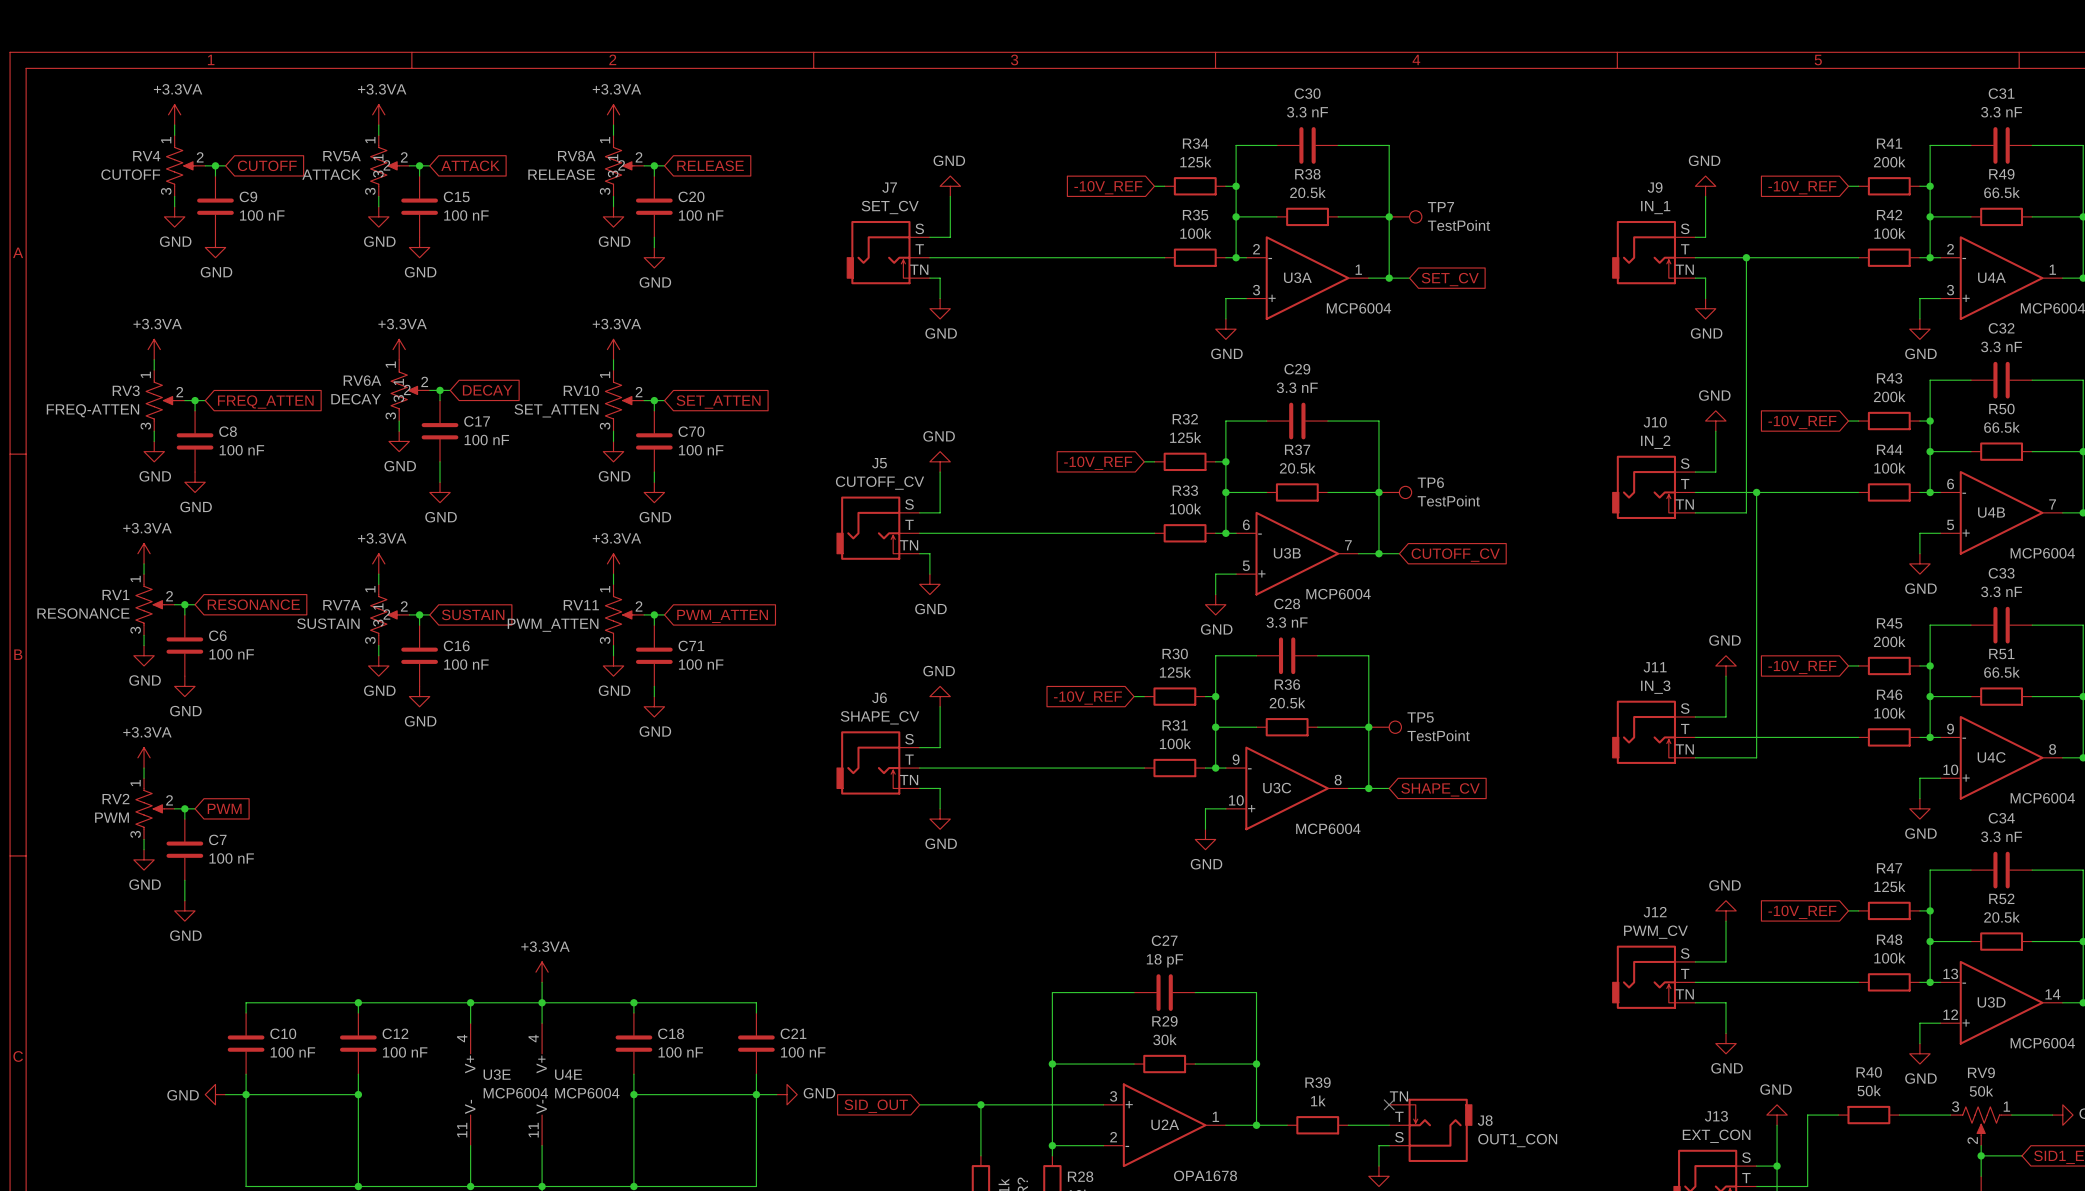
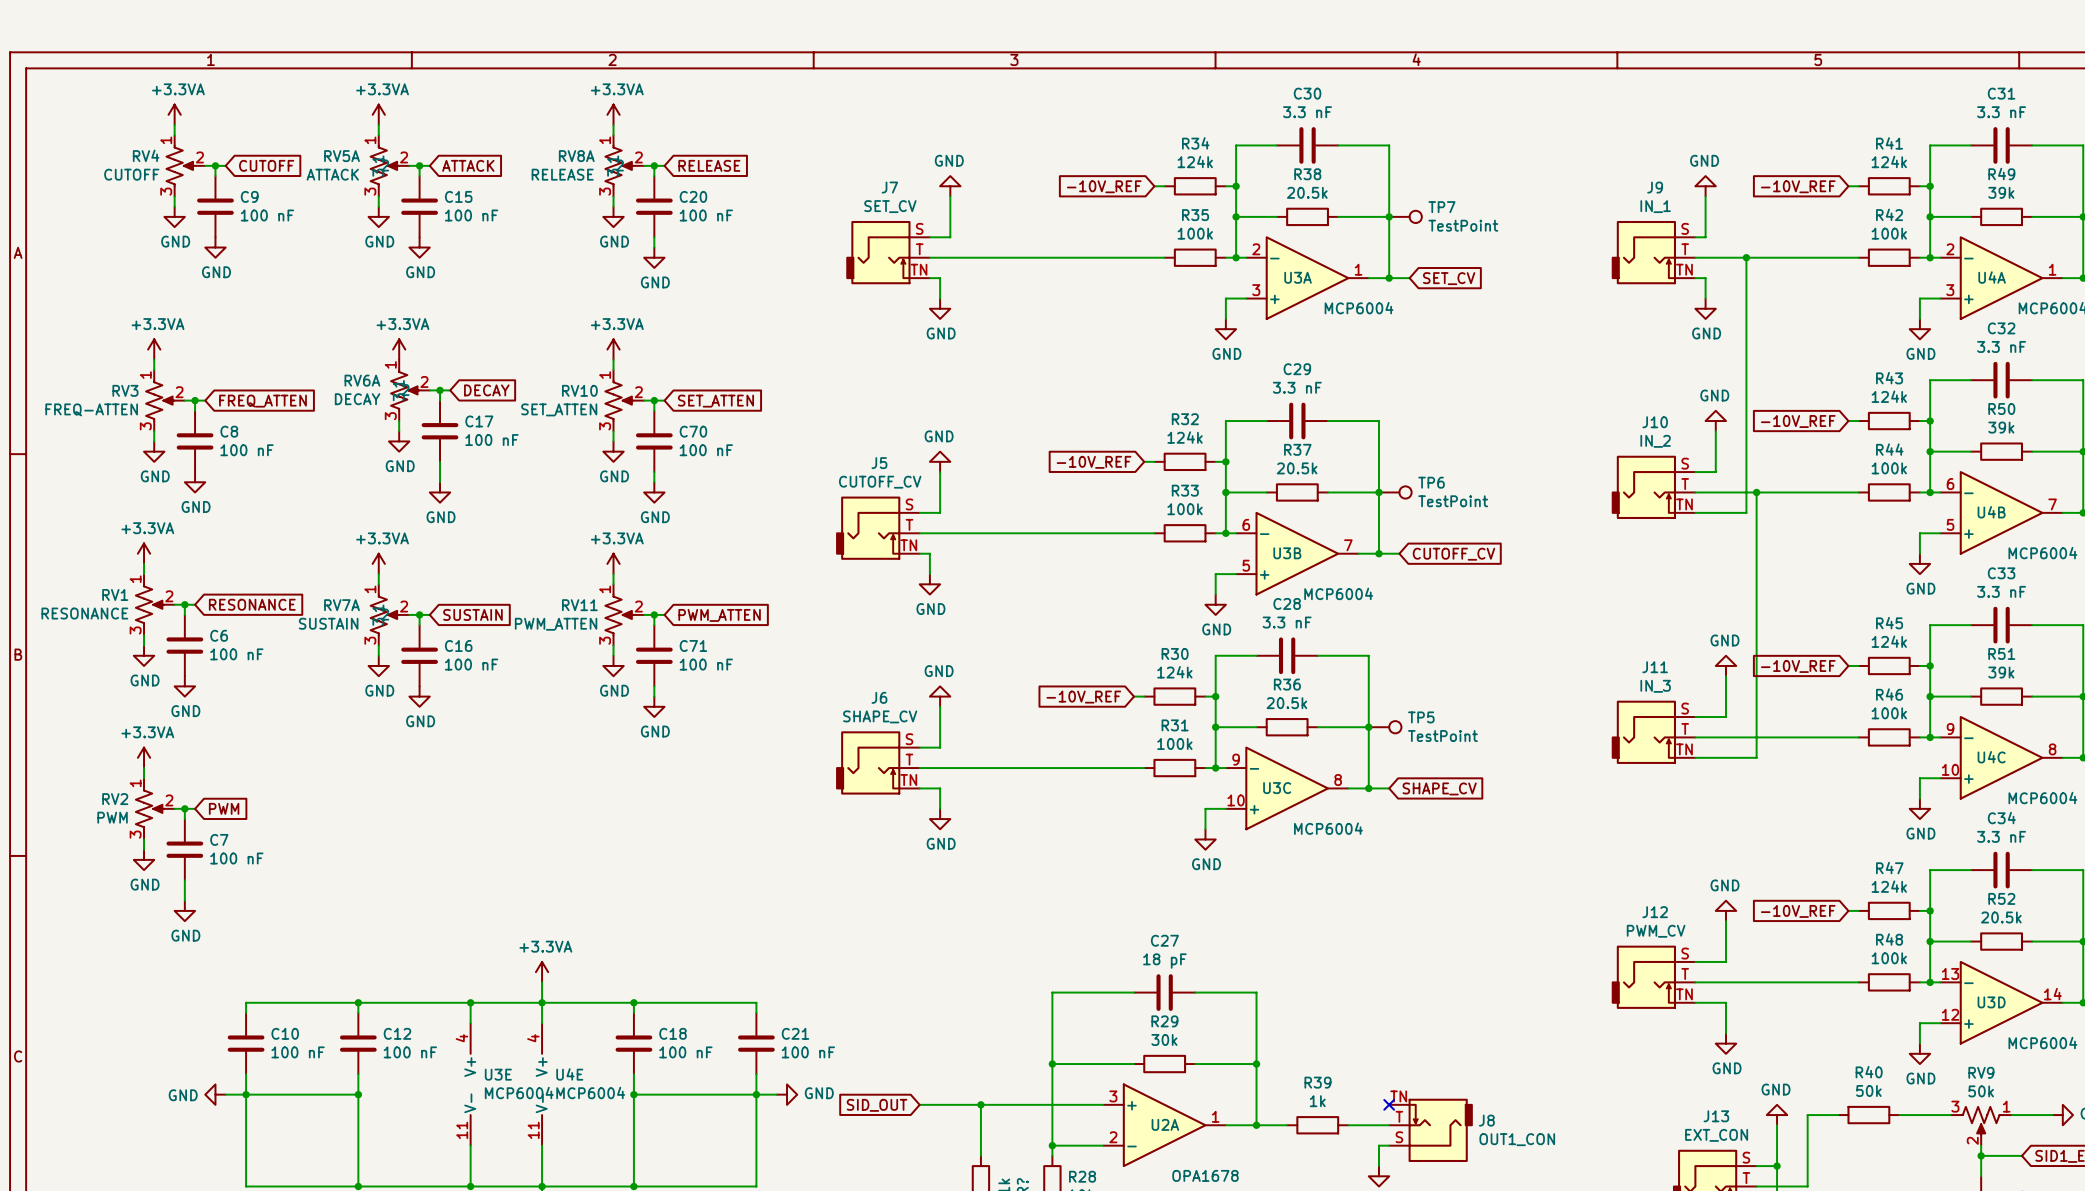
R34 value: 125k (1195, 162) -> 124k (1195, 161)
R41 value: 200k (1889, 162) -> 124k (1889, 161)
R49 value: 66.5k (2001, 192) -> 39k (2001, 192)
R43 value: 200k (1889, 396) -> 124k (1889, 396)
R50 value: 66.5k (2001, 427) -> 39k (2001, 427)
R32 value: 125k (1185, 437) -> 124k (1185, 437)
R45 value: 200k (1889, 641) -> 124k (1889, 641)
R30 value: 125k (1175, 672) -> 124k (1174, 672)
R51 value: 66.5k (2001, 672) -> 39k (2001, 672)
R47 value: 125k (1889, 886) -> 124k (1889, 886)

